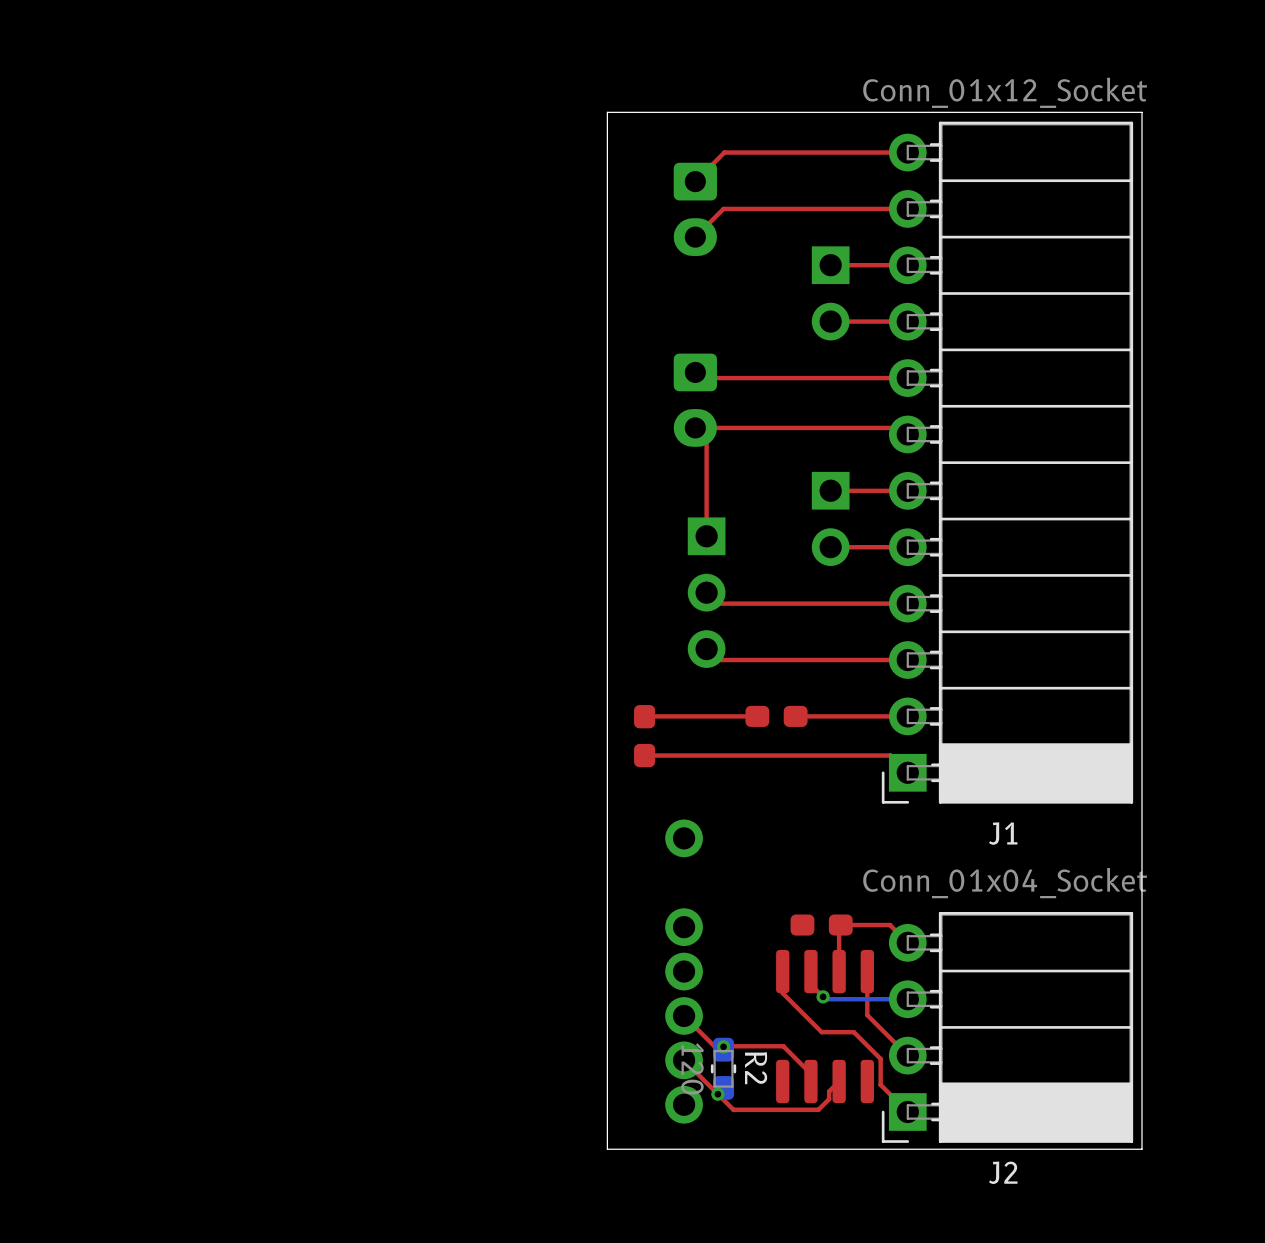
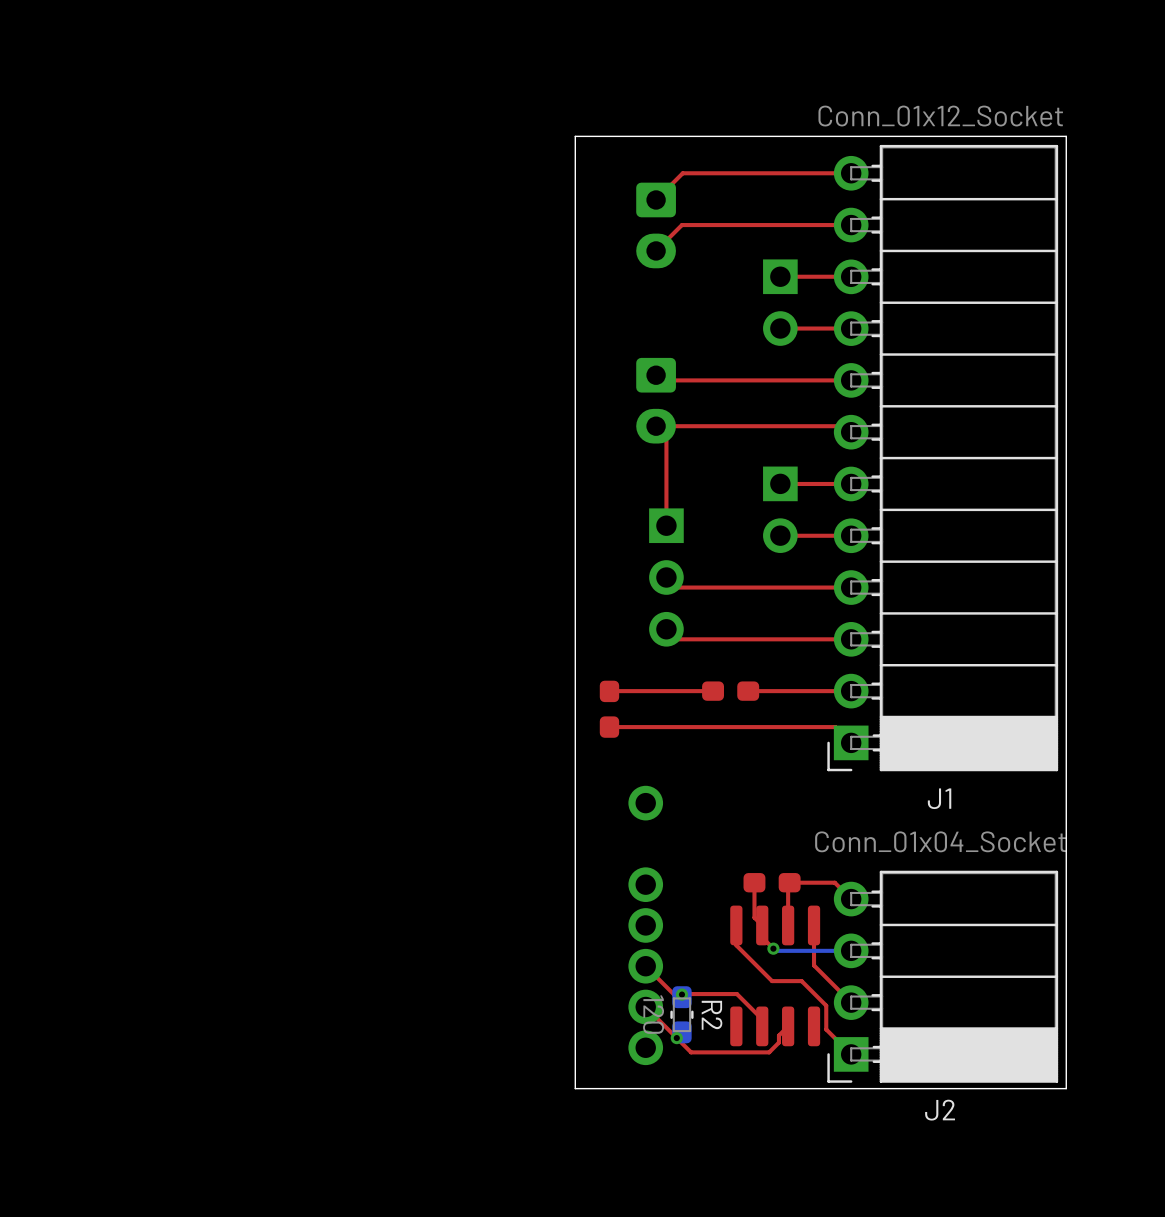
top track: none -> (754, 882) (754, 917) (762, 925)

